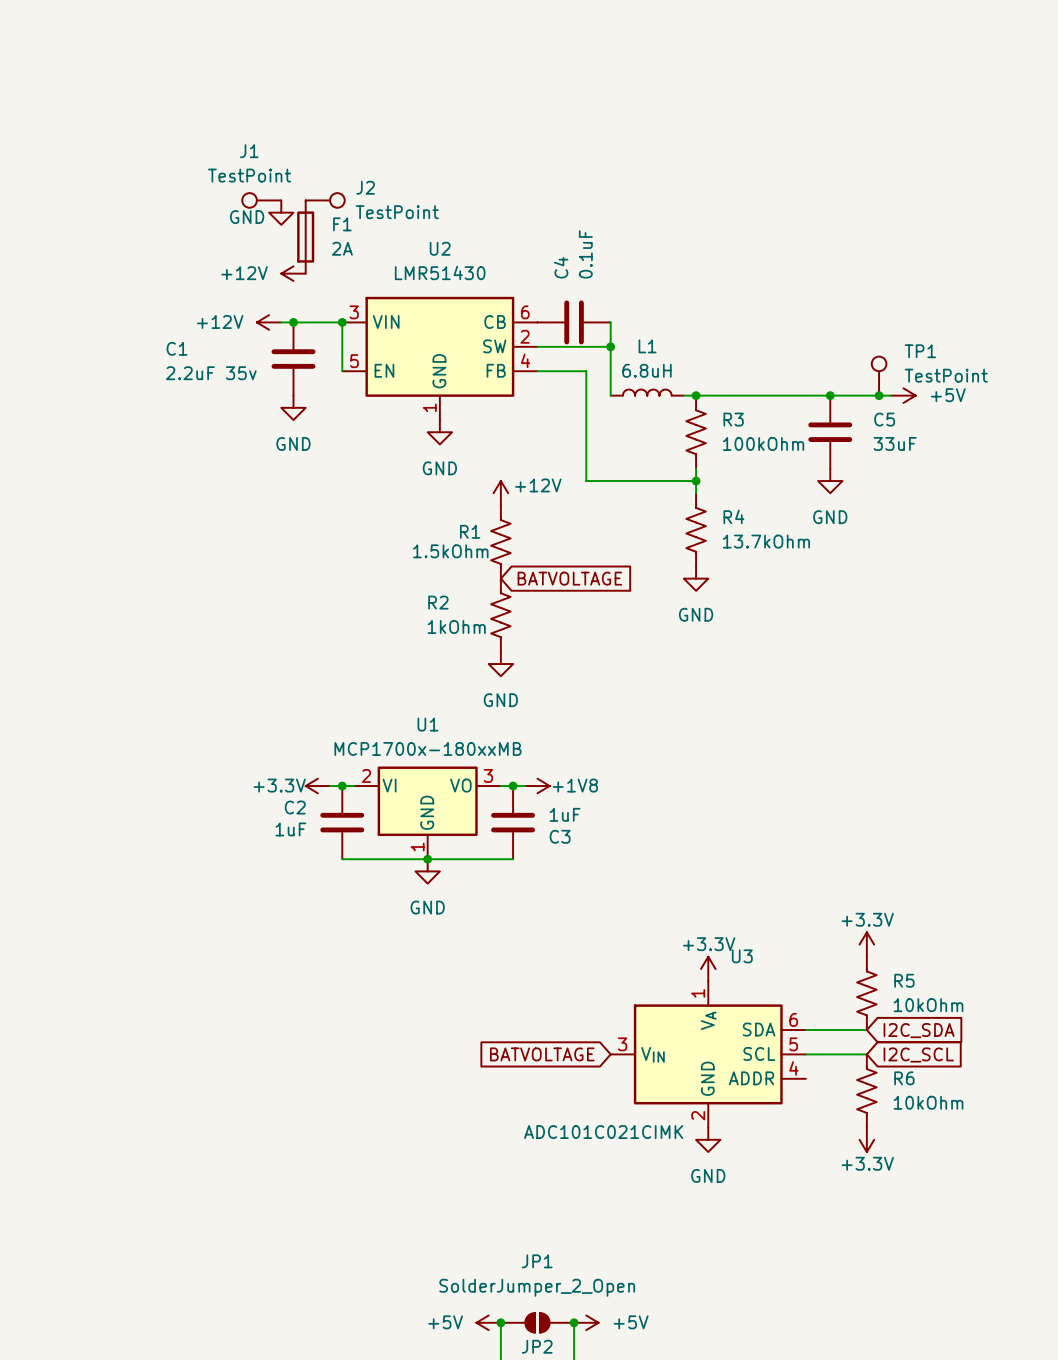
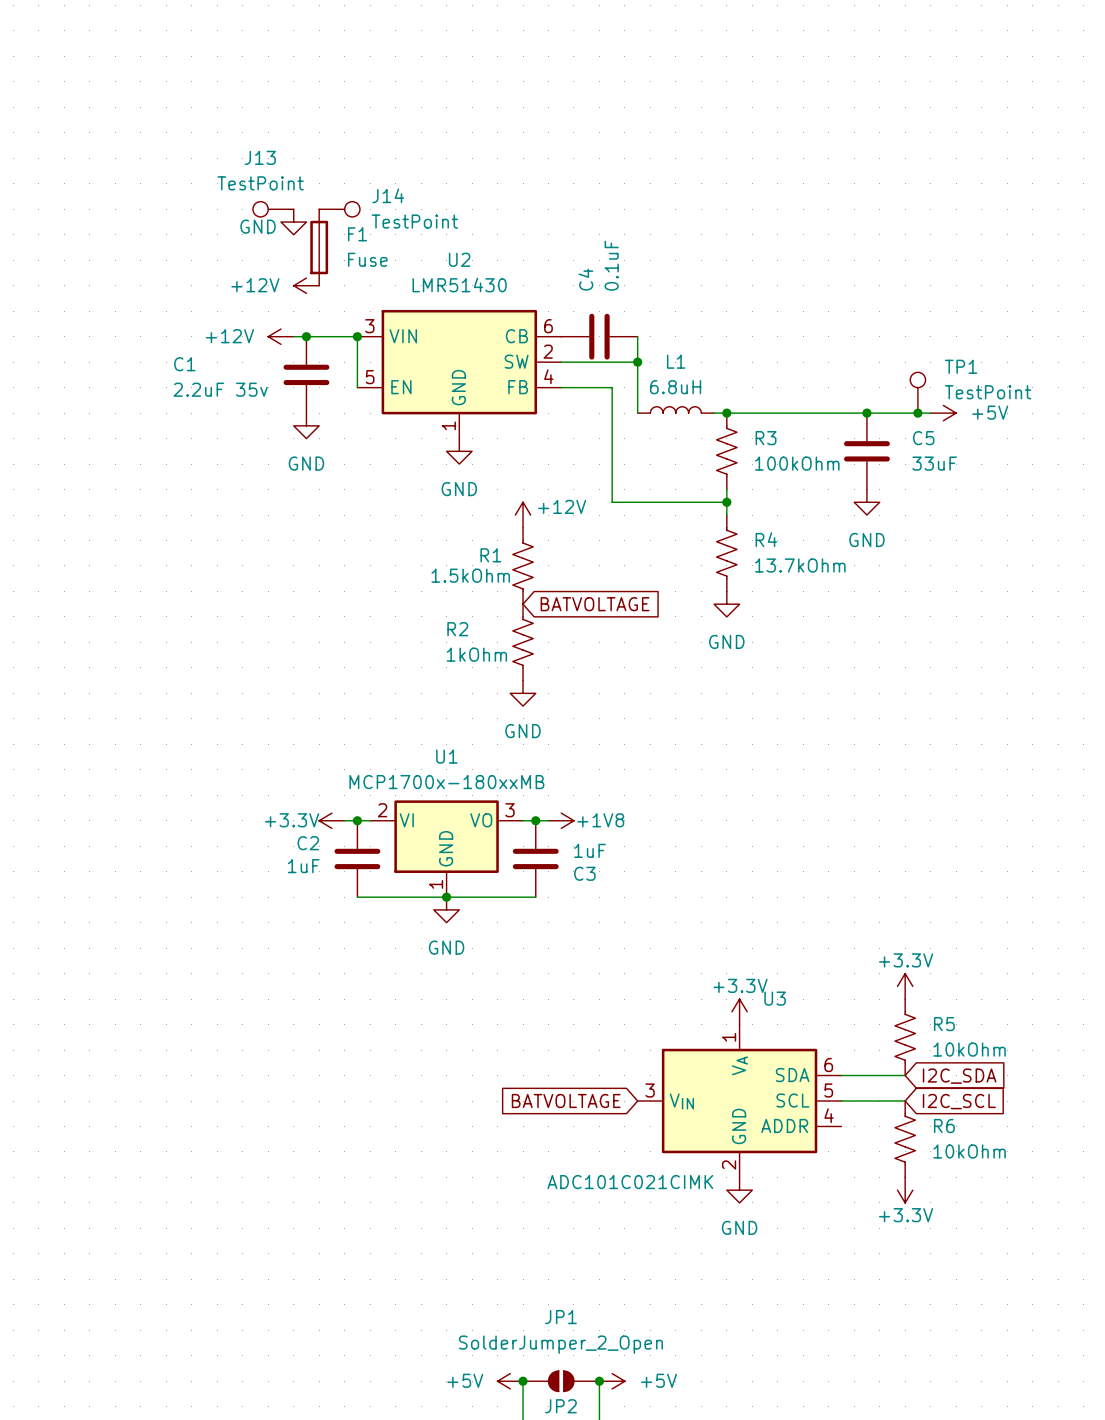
J1 name: J1 (249, 151) -> J13 (260, 157)
J2 name: J2 (365, 187) -> J14 (388, 195)
F1 value: 2A (342, 248) -> Fuse (367, 259)

